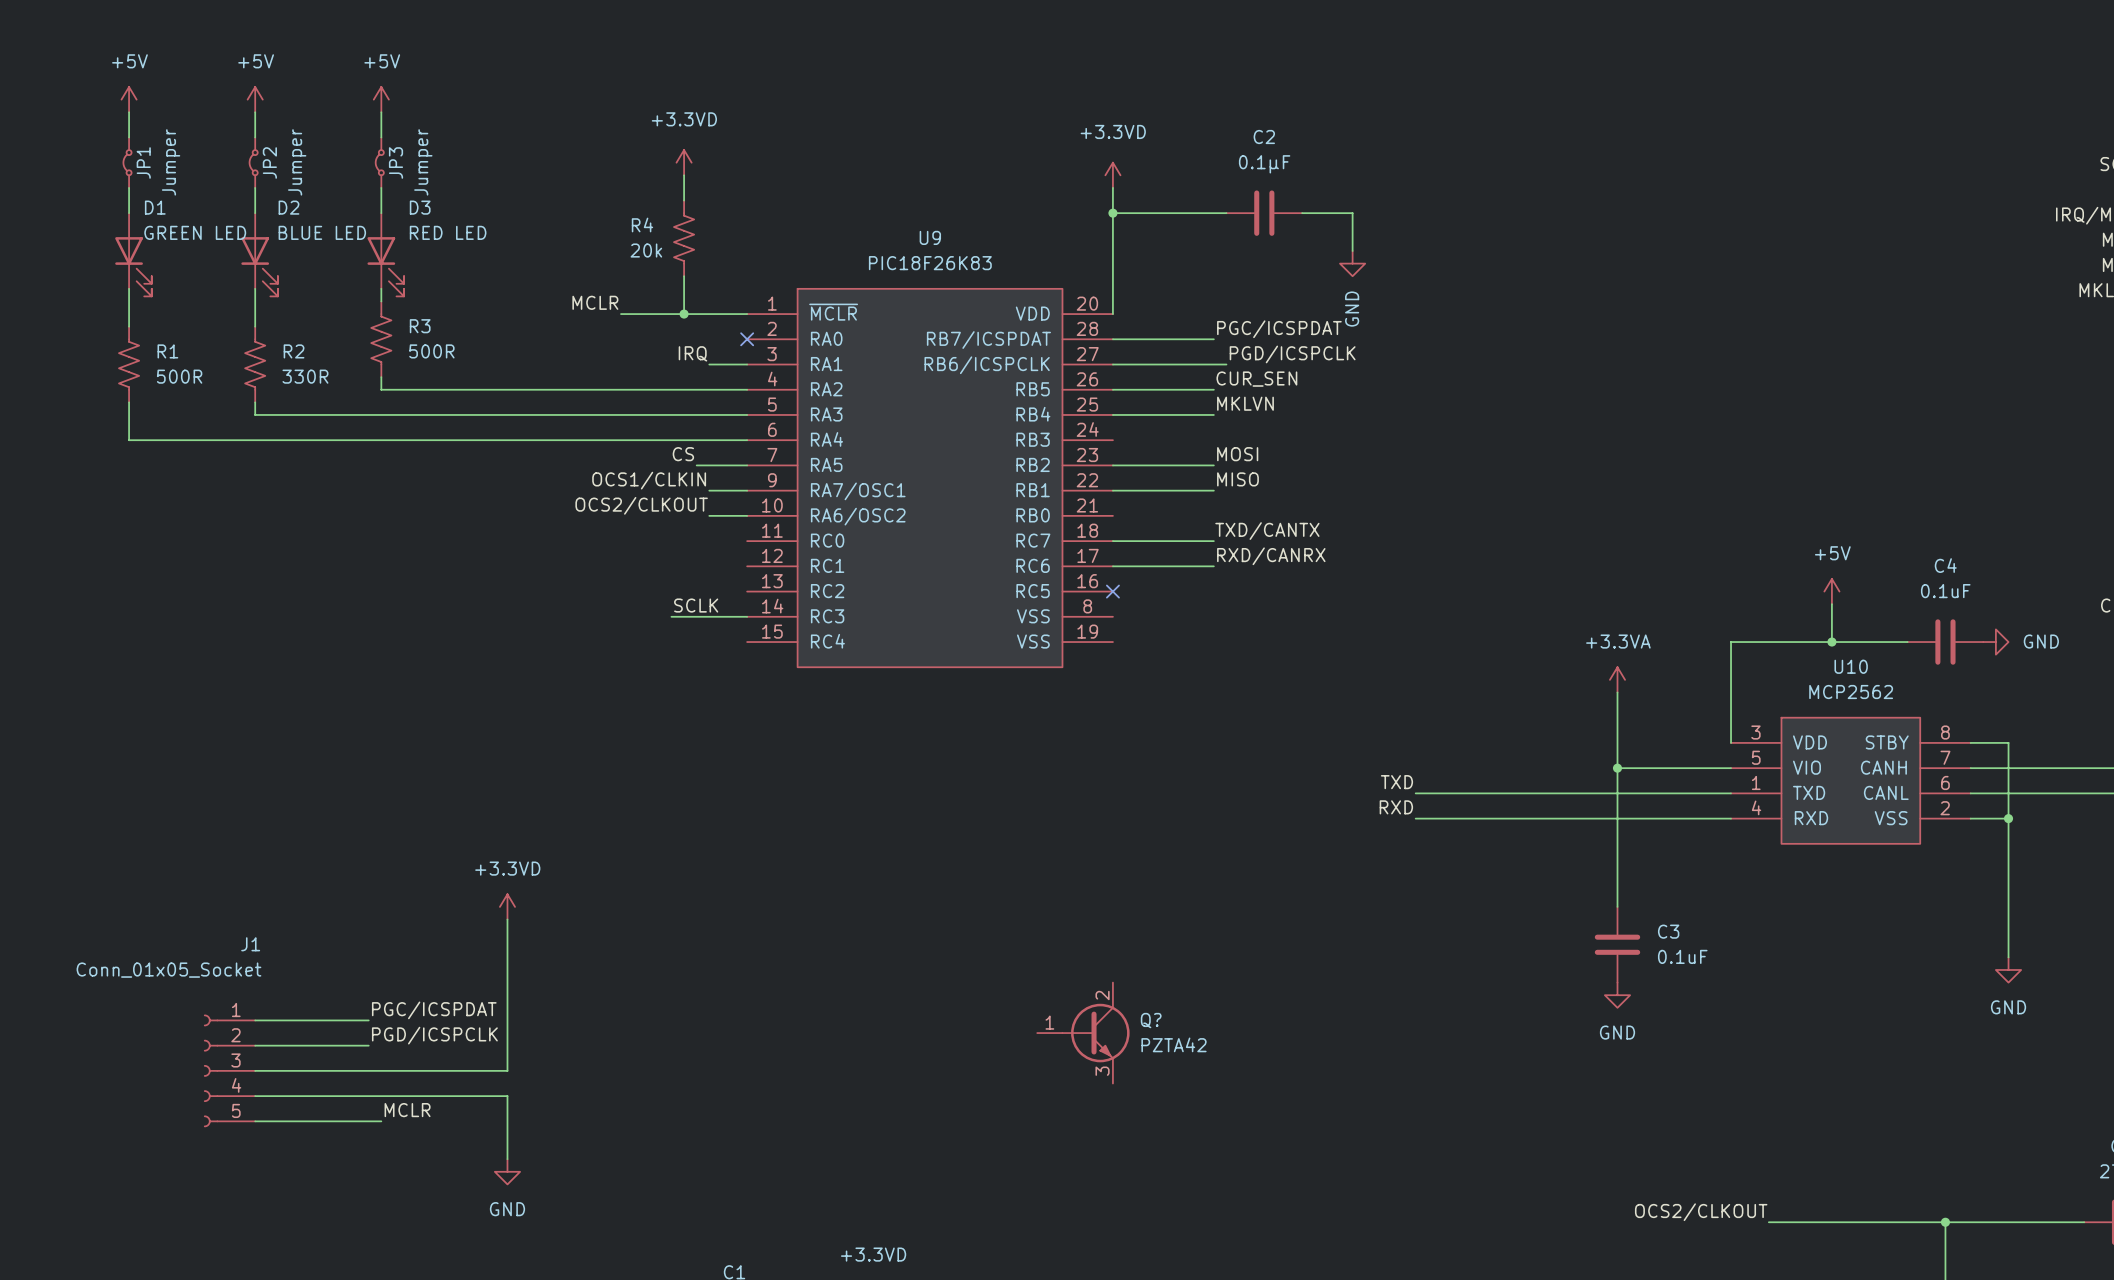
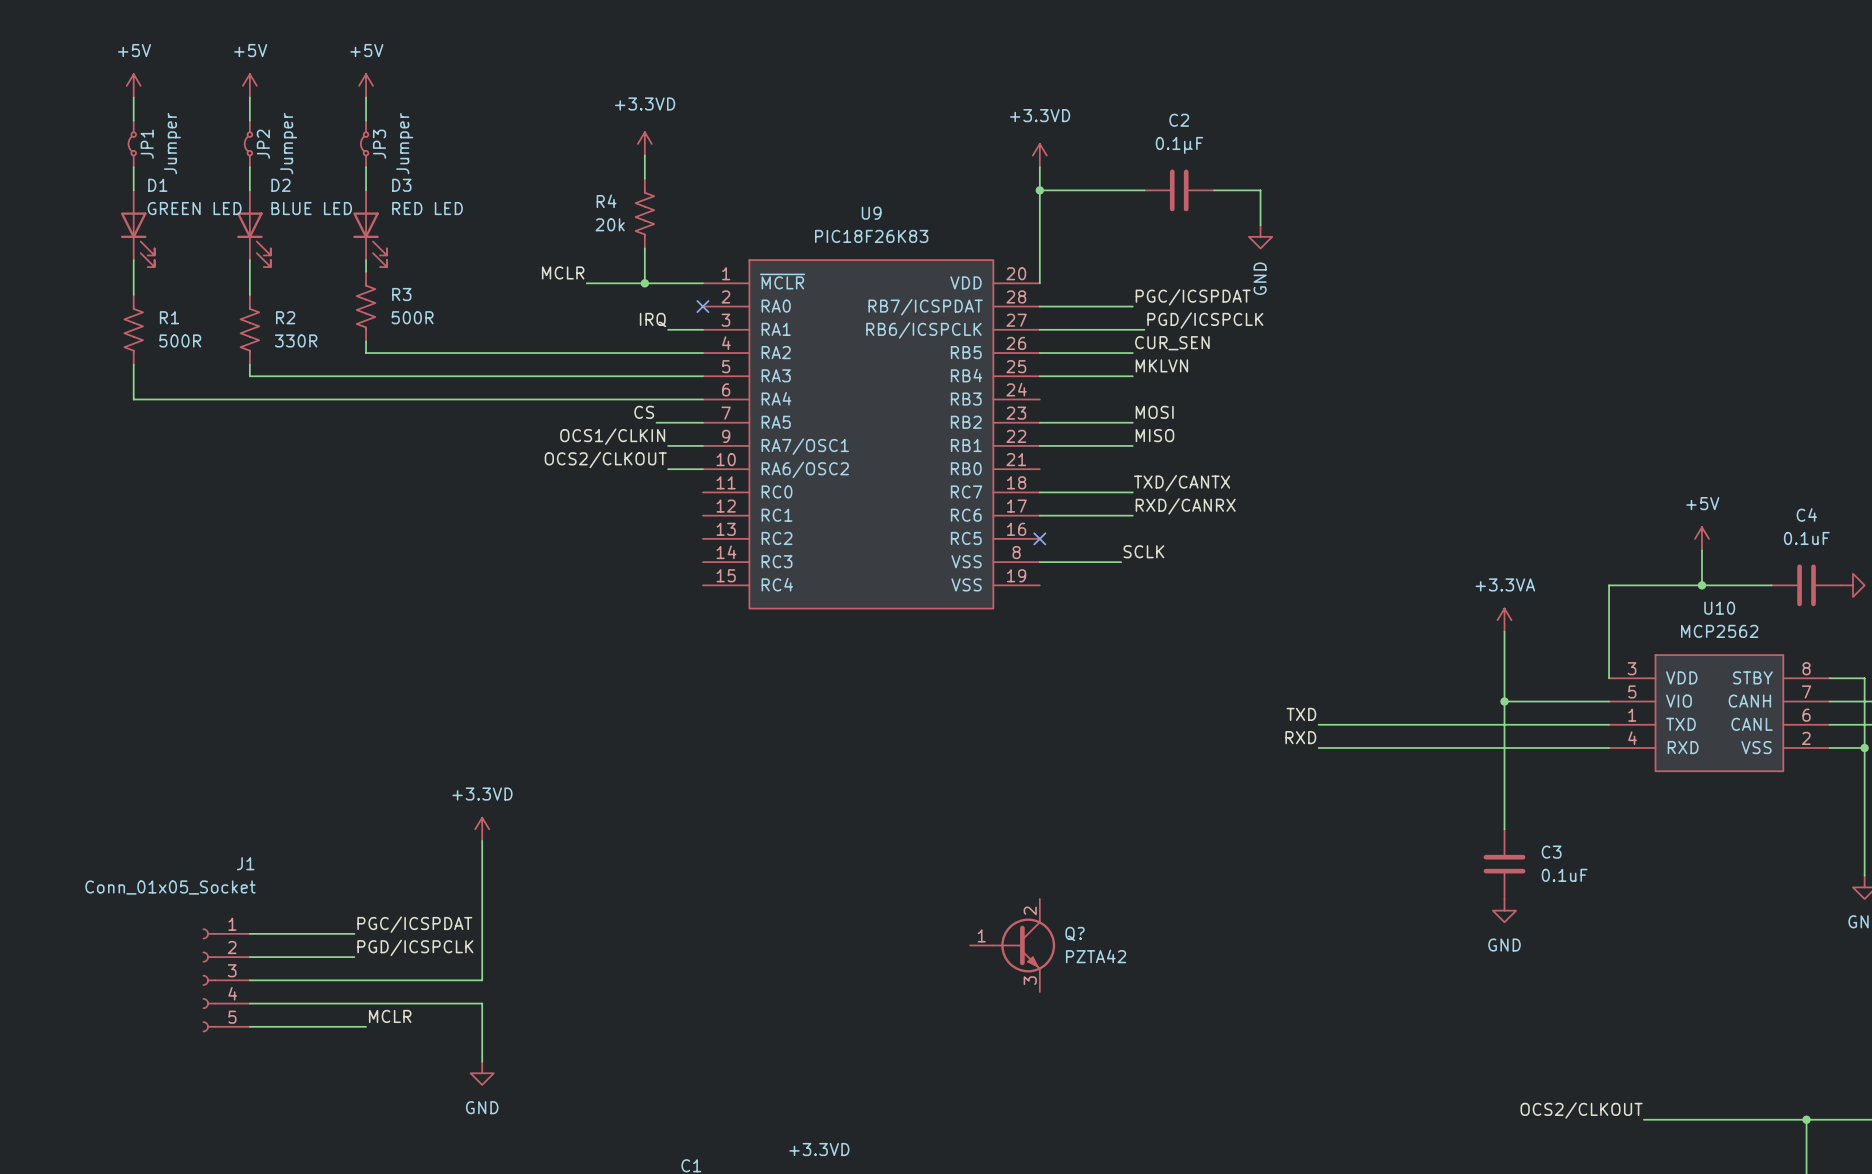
label: SCLK (696, 605) -> none
label: none -> SCLK (1143, 551)
wire: (671, 616) (747, 616) -> none
wire: none -> (1039, 562) (1121, 562)

